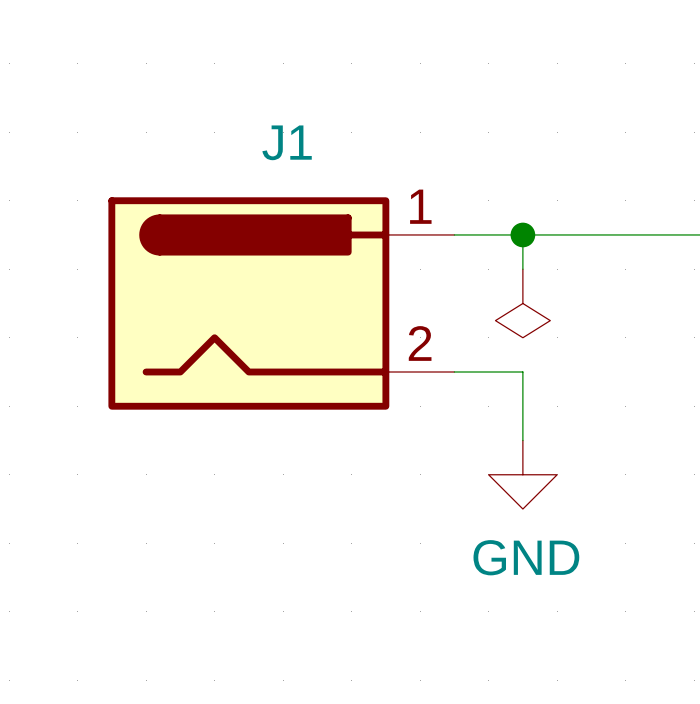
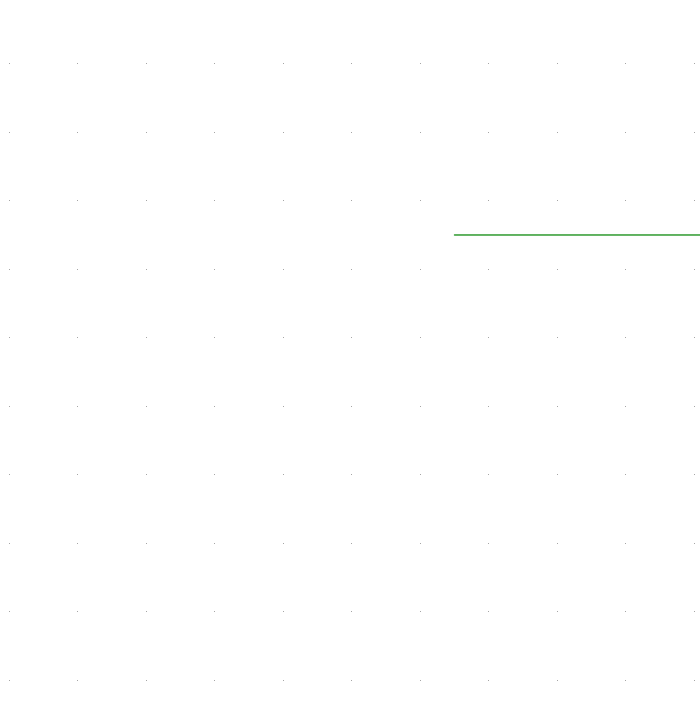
wire: (522, 234) (522, 269) -> none
junction: (522, 234) -> none
J1: (281, 303) -> none
power symbol: (522, 303) -> none
wire: (454, 372) (522, 372) (522, 440) -> none
power symbol: GND (522, 474) -> none

